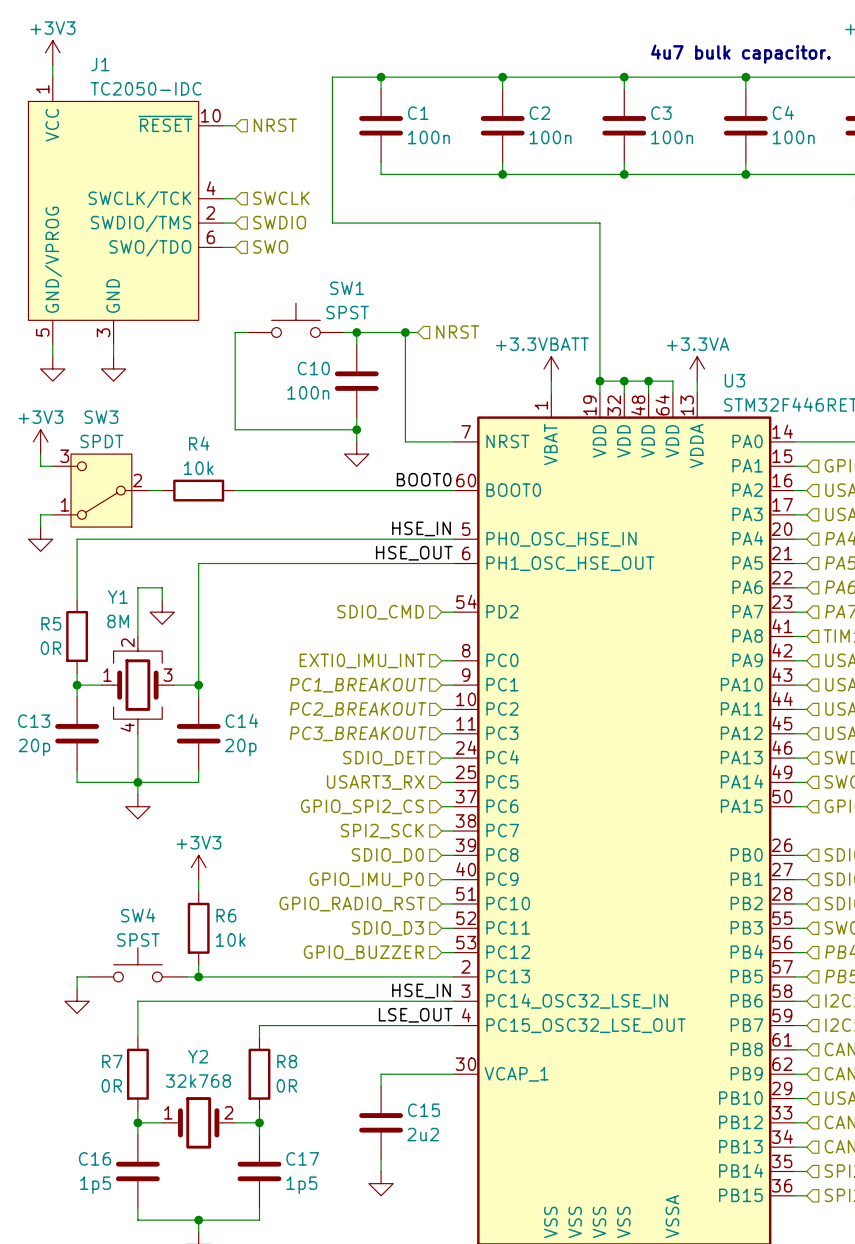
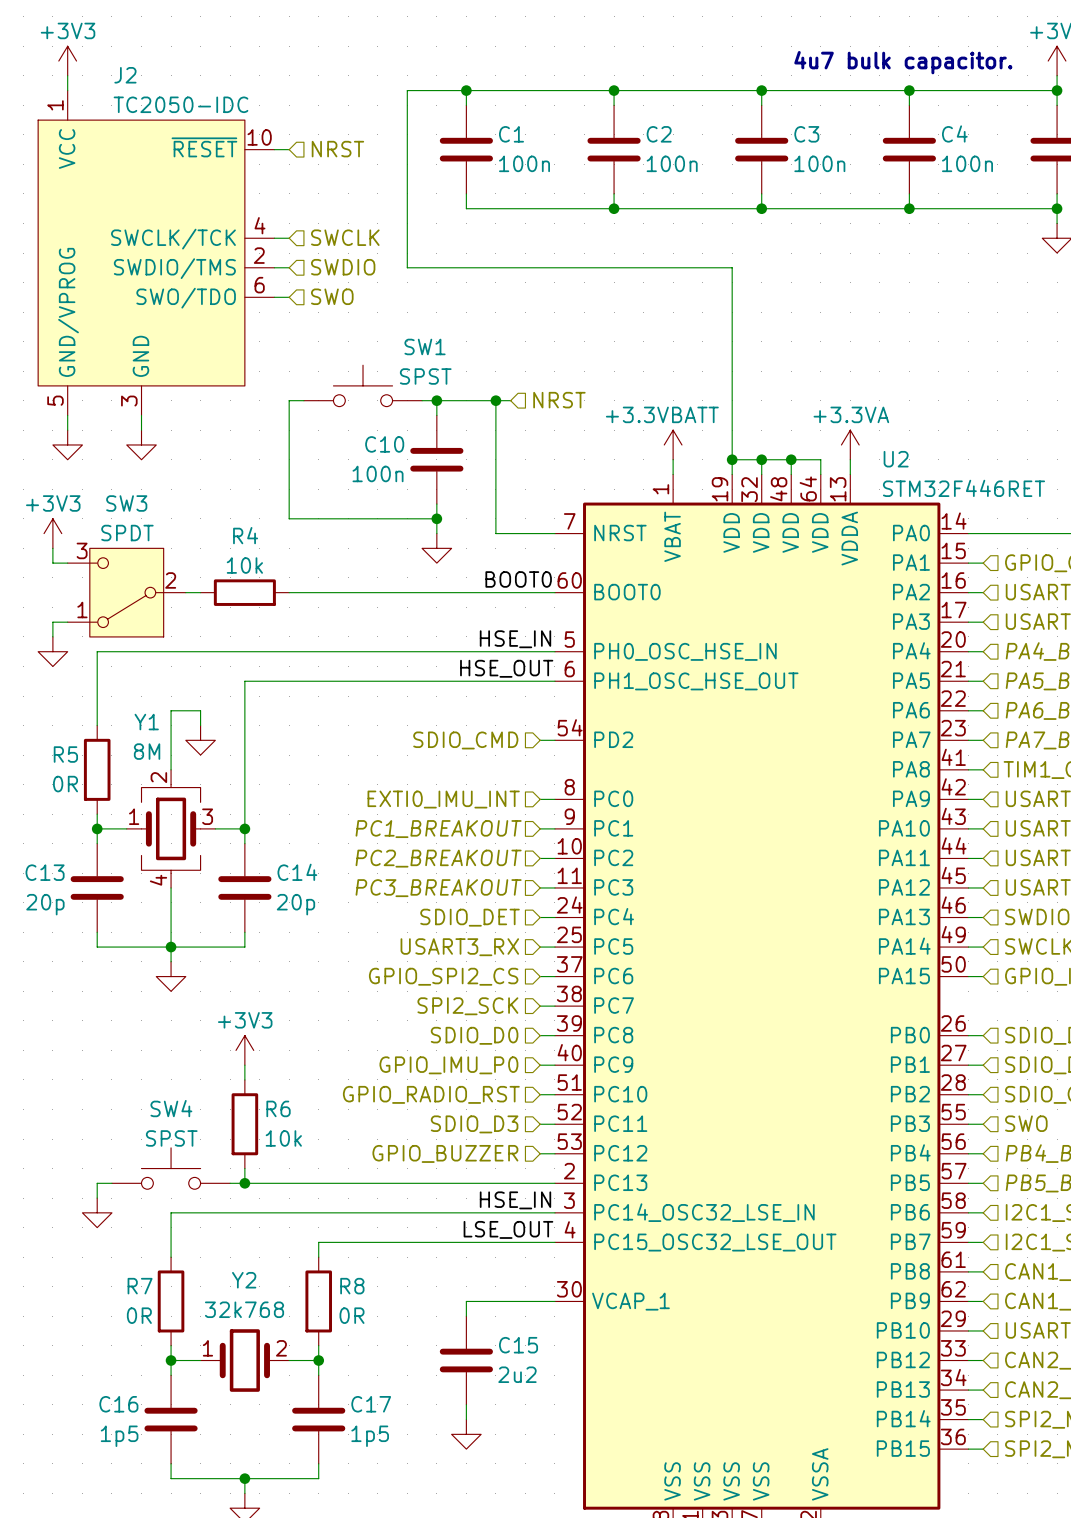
J1 name: J1 (100, 64) -> J2 (125, 75)
U3 name: U3 (734, 380) -> U2 (896, 459)

